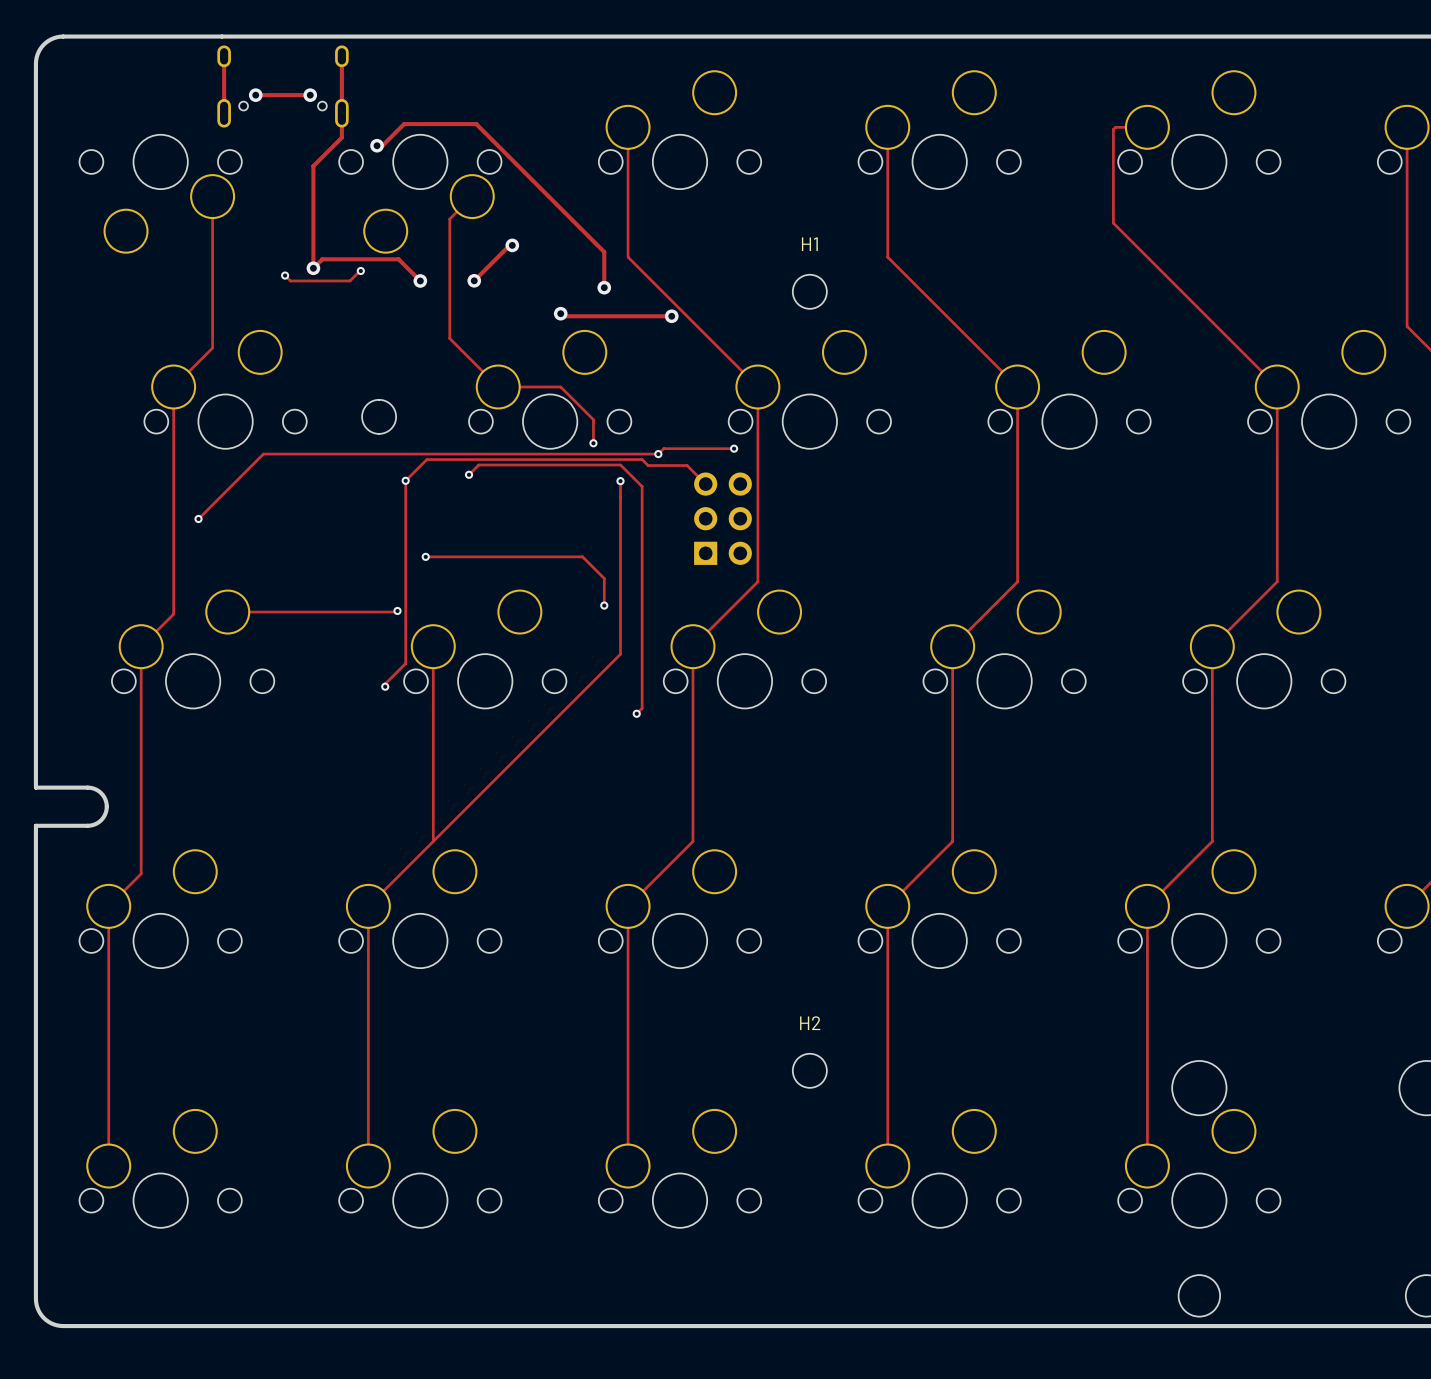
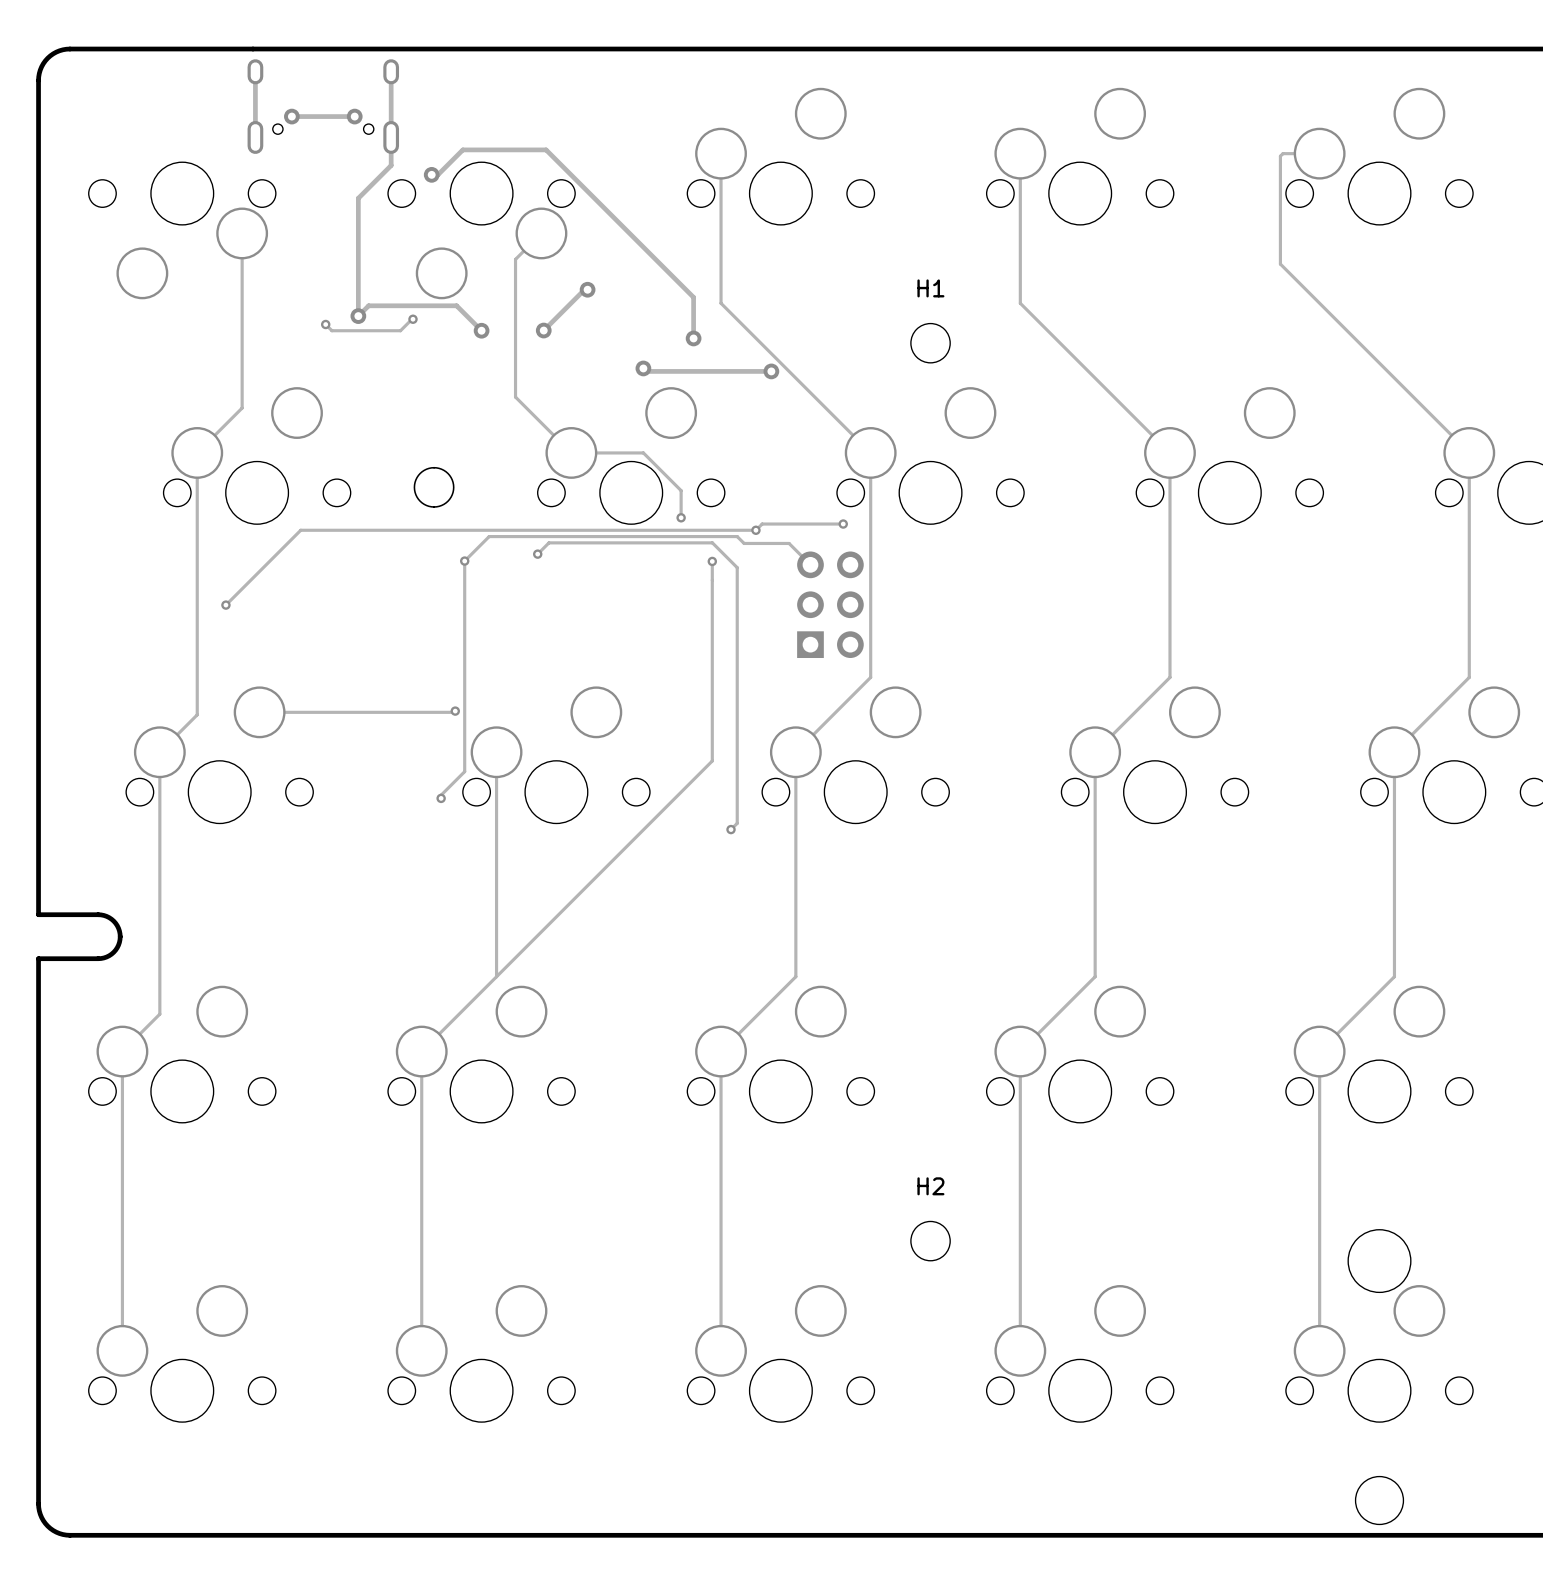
track: (425, 556) (582, 556) (604, 578) (604, 605) -> none
via: (425, 556) -> none
via: (604, 605) -> none

